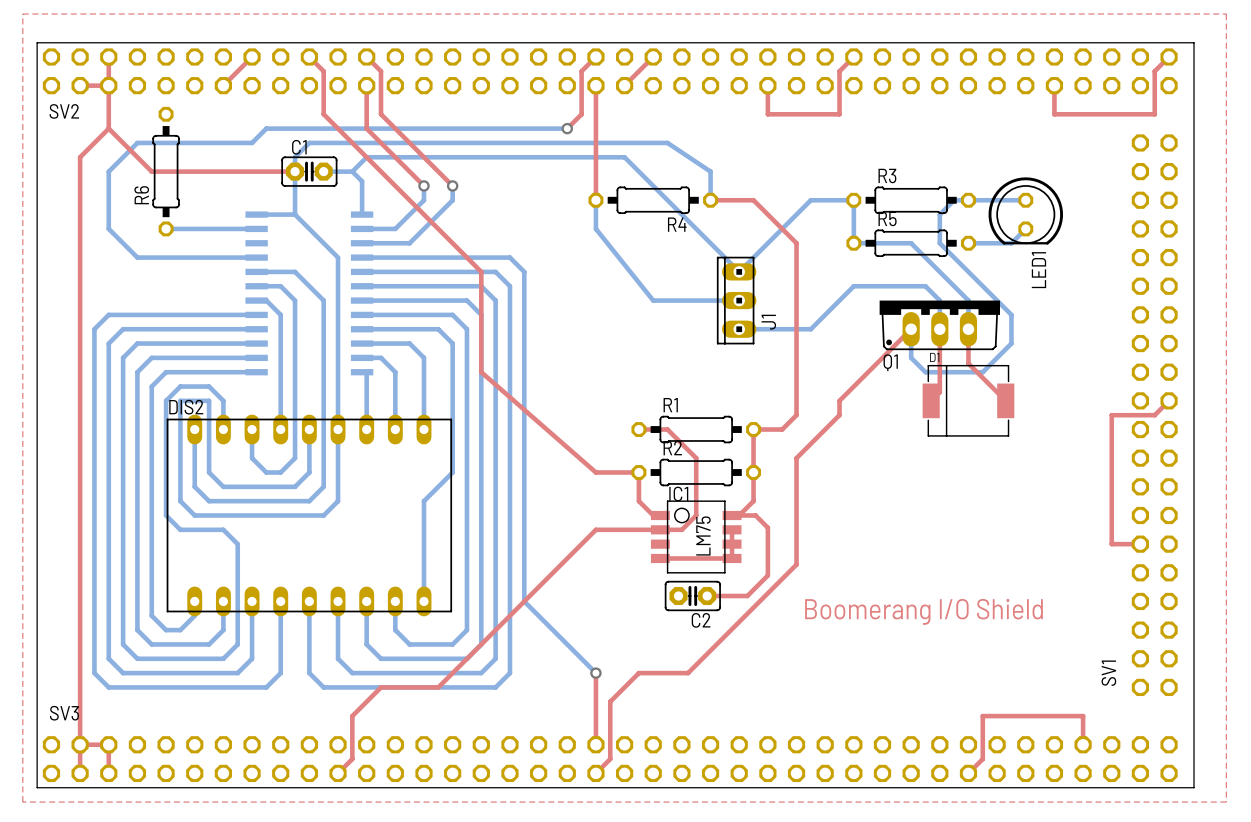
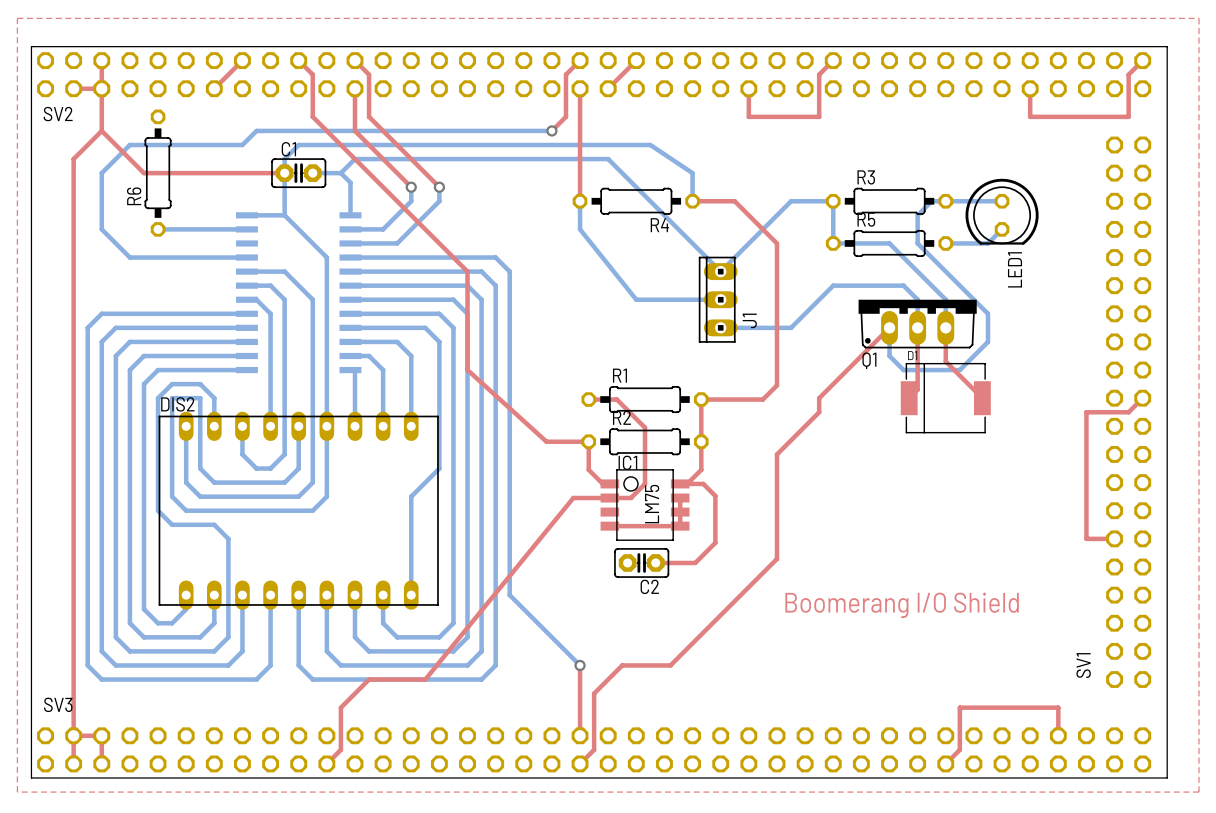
top track: (481, 372) (595, 472) (638, 472) (638, 501) (653, 515) (660, 515) -> (467, 370) (546, 441) (588, 441) (588, 469) (602, 483) (609, 483)
top track: (796, 387) (796, 415) (782, 429) (753, 429) (753, 501) (739, 515) -> (776, 385) (762, 399) (701, 399) (701, 469) (687, 483)
top track: (638, 429) (667, 429) (696, 458) (696, 515) (681, 529) (595, 529) (438, 687) -> (588, 399) (616, 399) (645, 427) (645, 483) (630, 498) (573, 498) (425, 679)
R1 position: (696, 429) -> (645, 399)
R2 position: (696, 472) -> (645, 441)
top track: (732, 515) (755, 515) (767, 527) (767, 575) (747, 595) (707, 595) -> (680, 483) (703, 483) (715, 495) (715, 542) (695, 562) (655, 562)
top track: (732, 529) (732, 558) (660, 558) -> (680, 498) (680, 526) (609, 526)
IC1 position: (696, 536) -> (645, 505)
C2 position: (692, 595) -> (641, 562)

